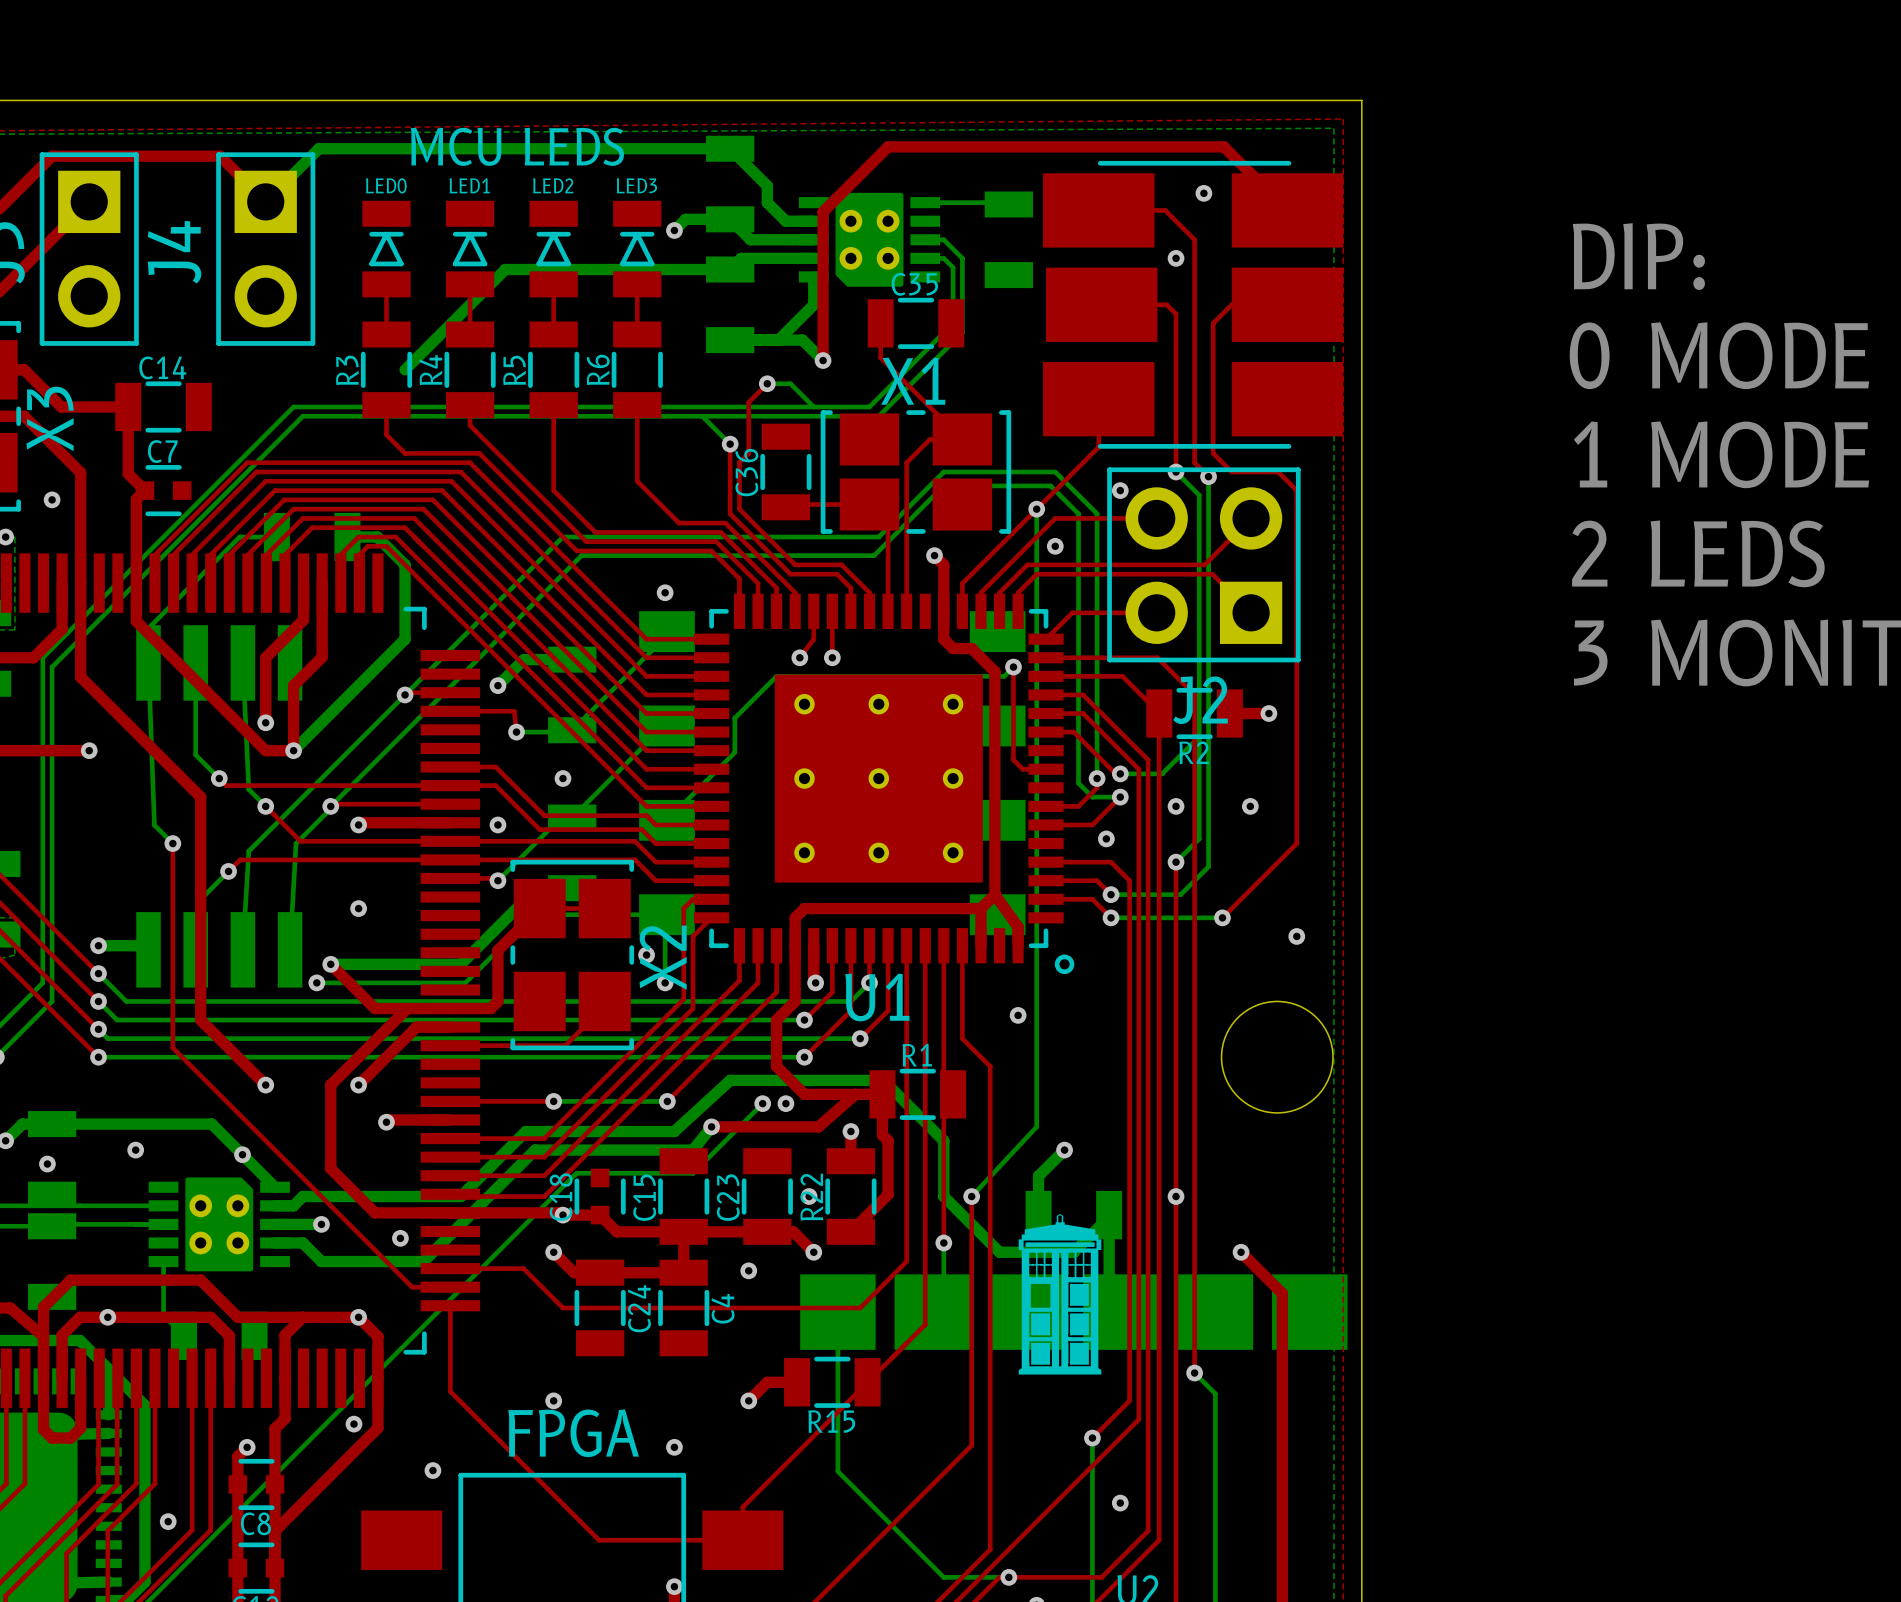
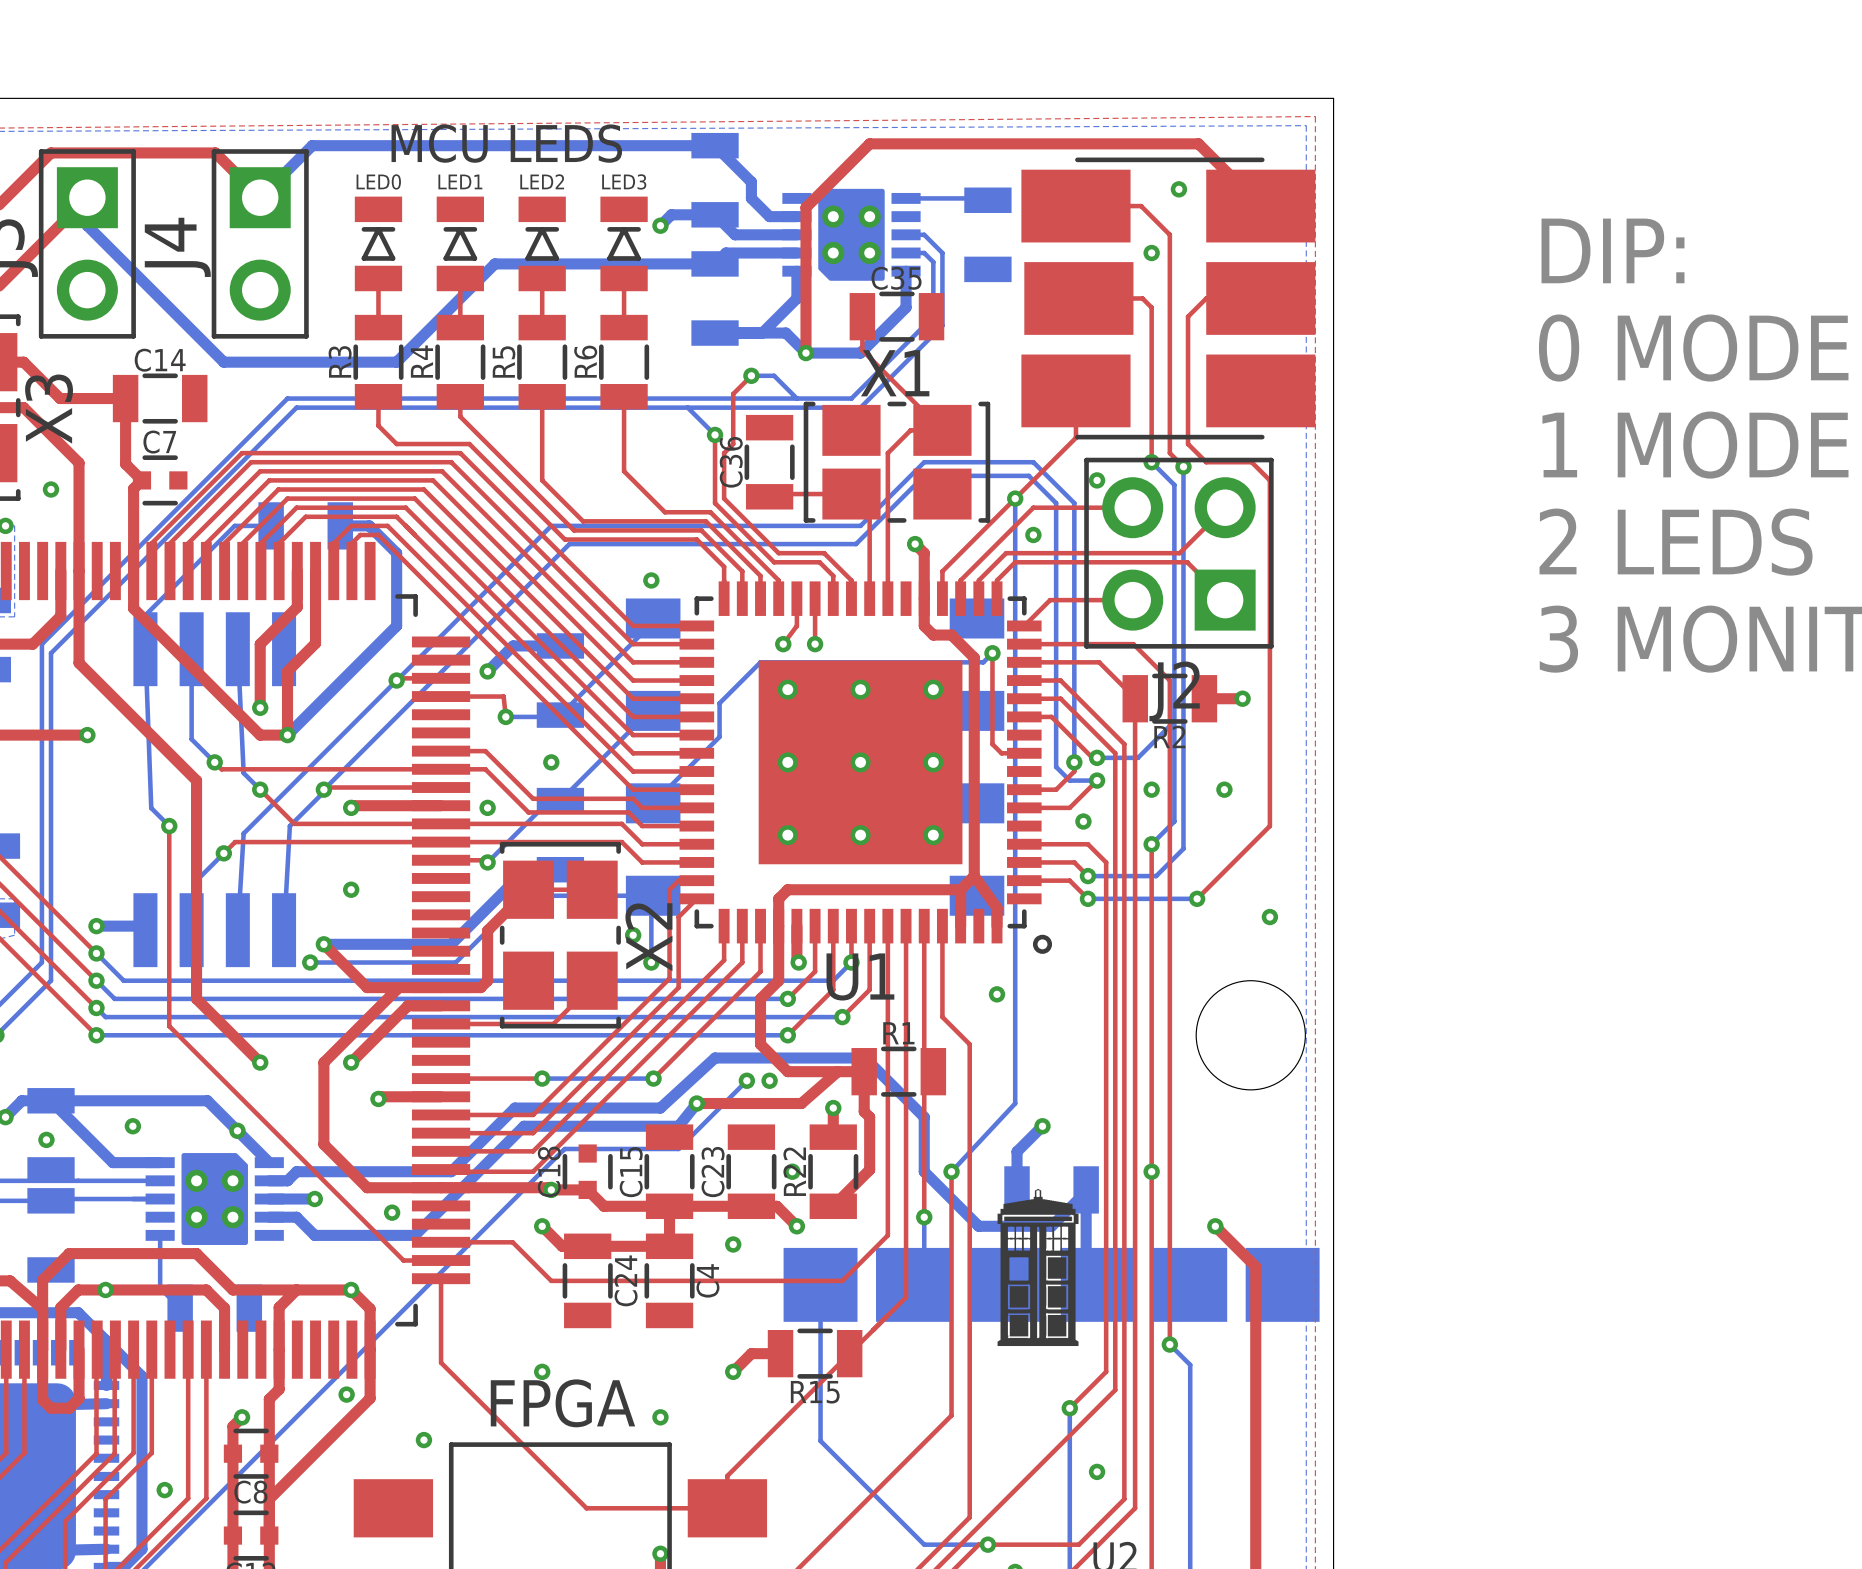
bottom track: none -> (87, 197) (87, 225) (223, 362) (396, 362)
bottom track: none -> (906, 271) (906, 307) (860, 353) (805, 353)
bottom track: none -> (51, 1100) (112, 1162) (160, 1162)

